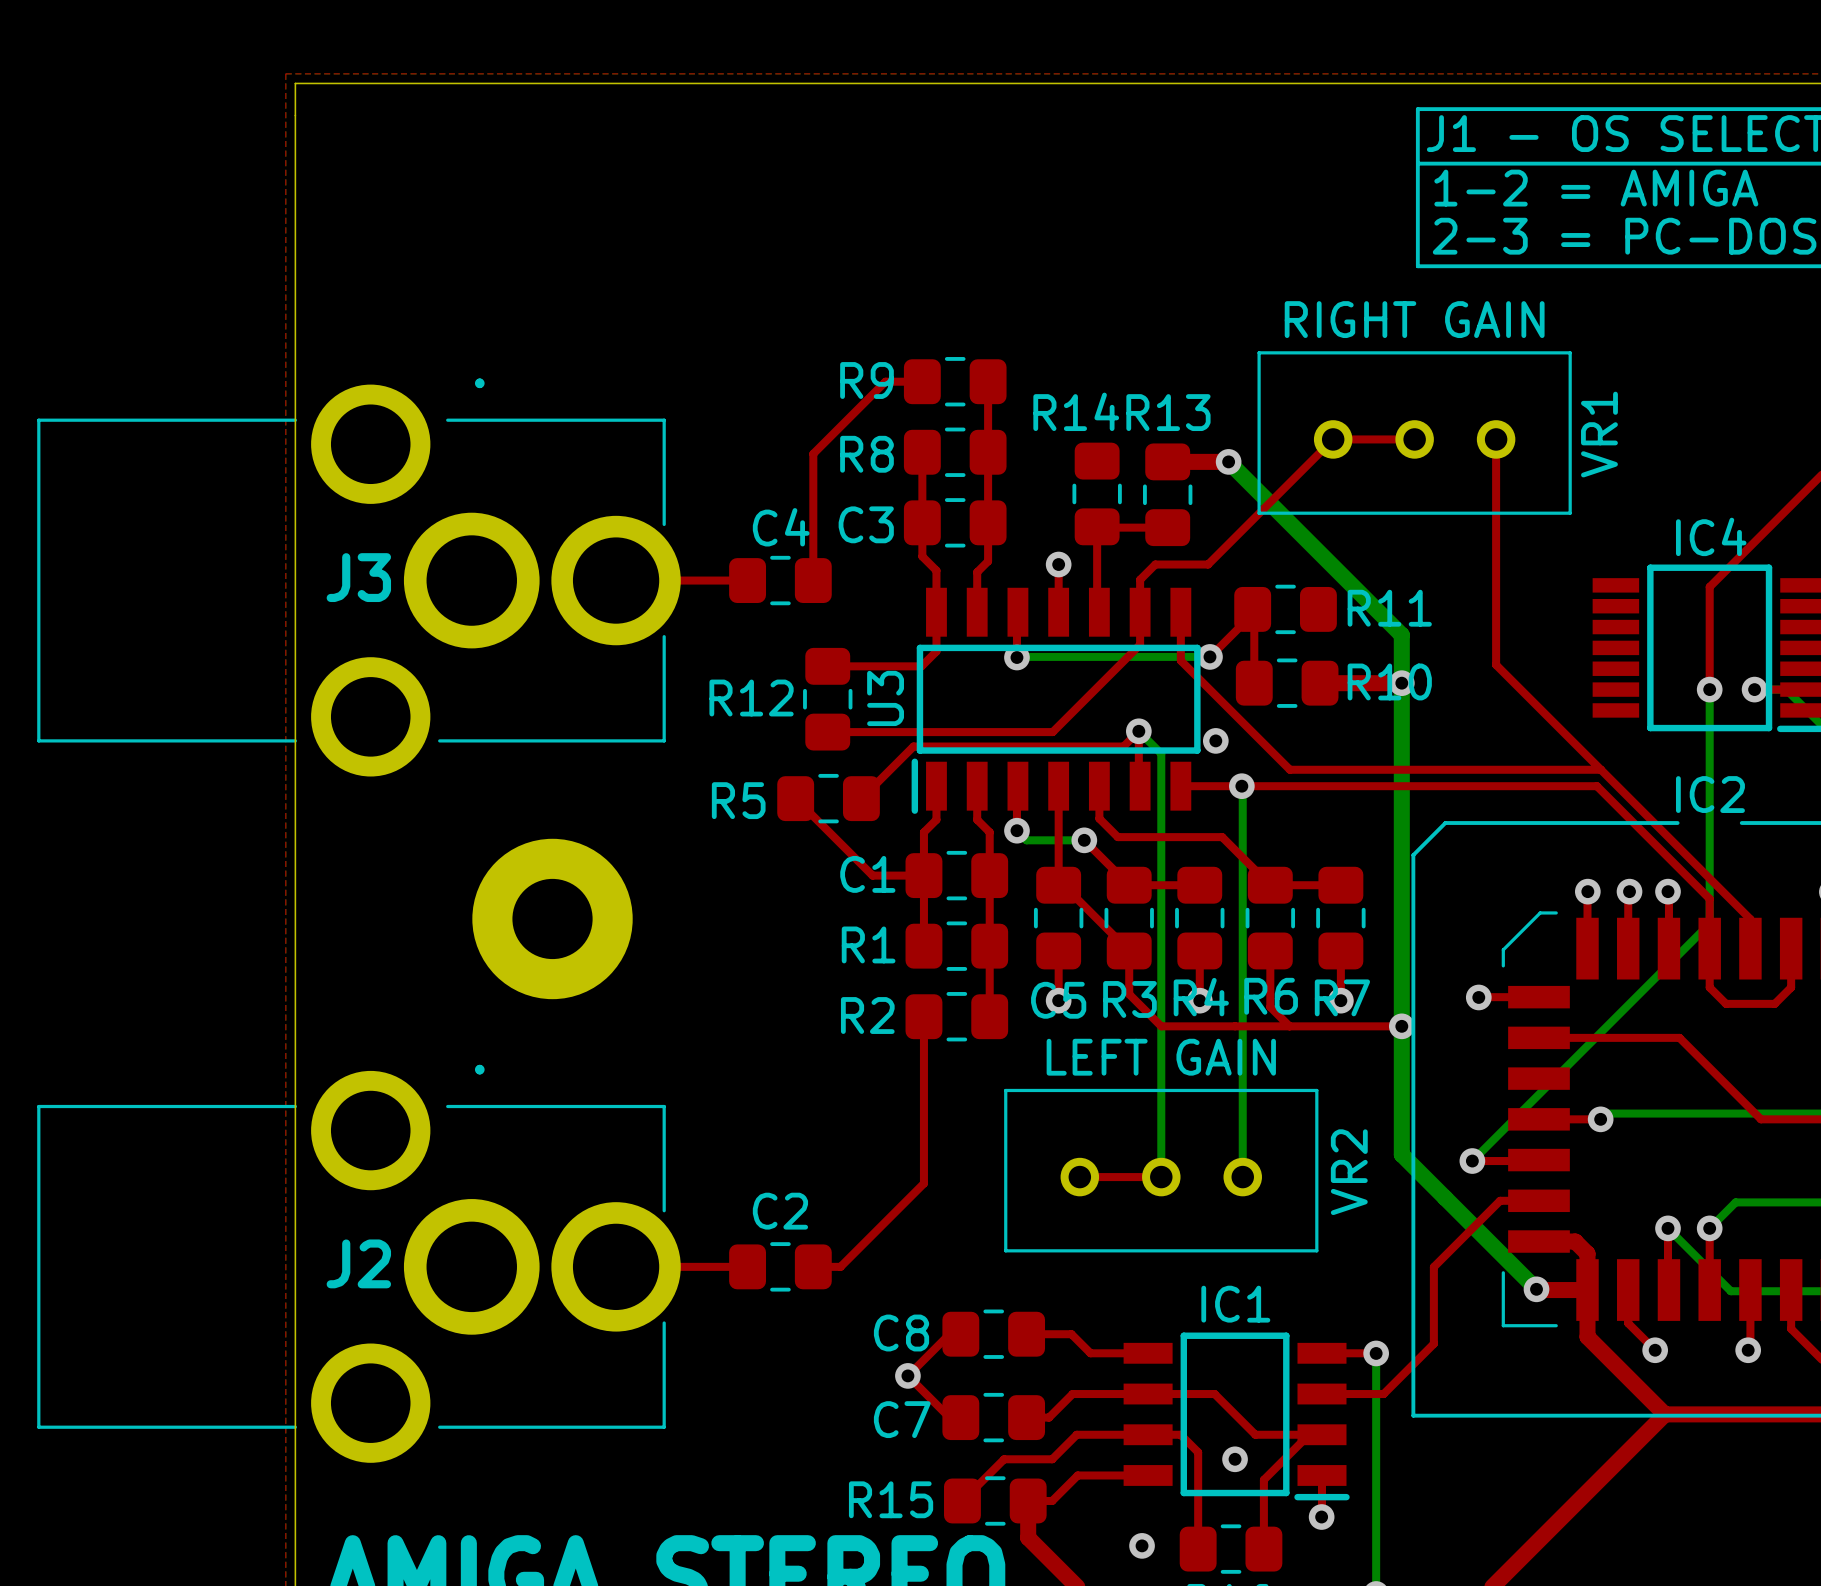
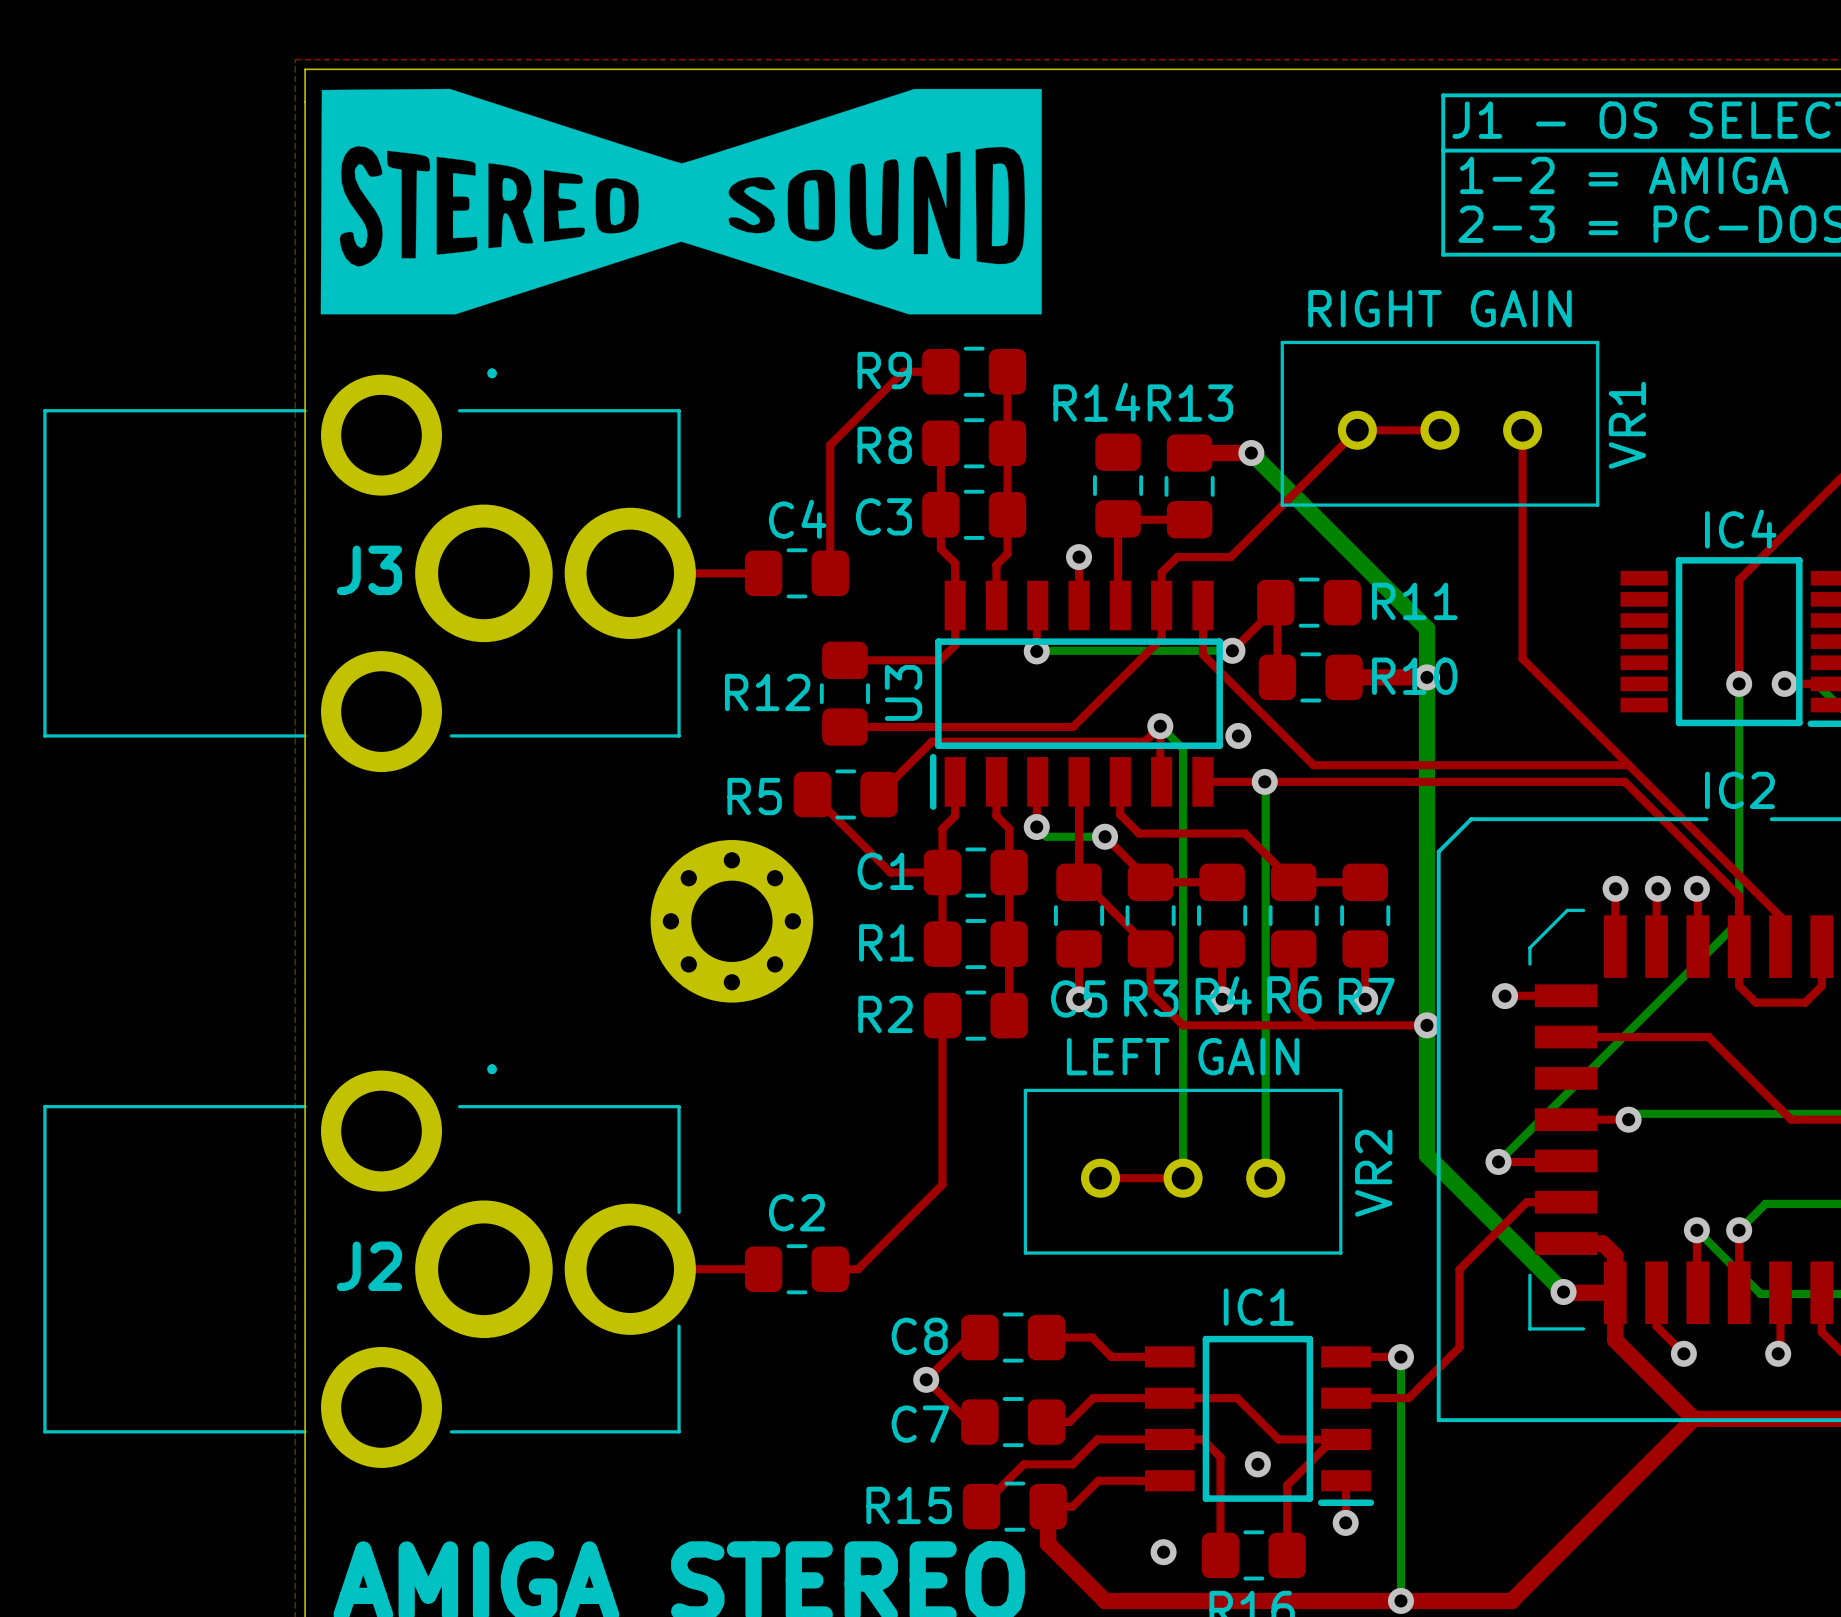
drawing: none -> [320, 88, 1042, 315]
part: (552, 918) -> none
part: none -> (731, 921)

